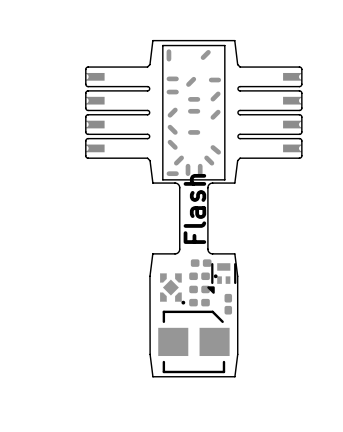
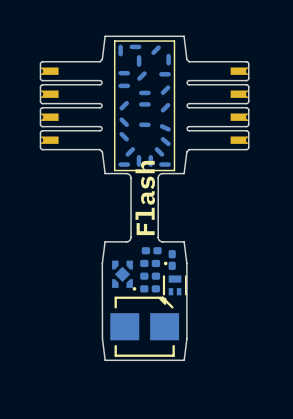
part footprint: [162, 45, 226, 181] -> [114, 40, 175, 171]
part footprint: [207, 263, 237, 294] -> [168, 250, 176, 270]
part footprint: [224, 293, 233, 315] -> [159, 275, 188, 305]

